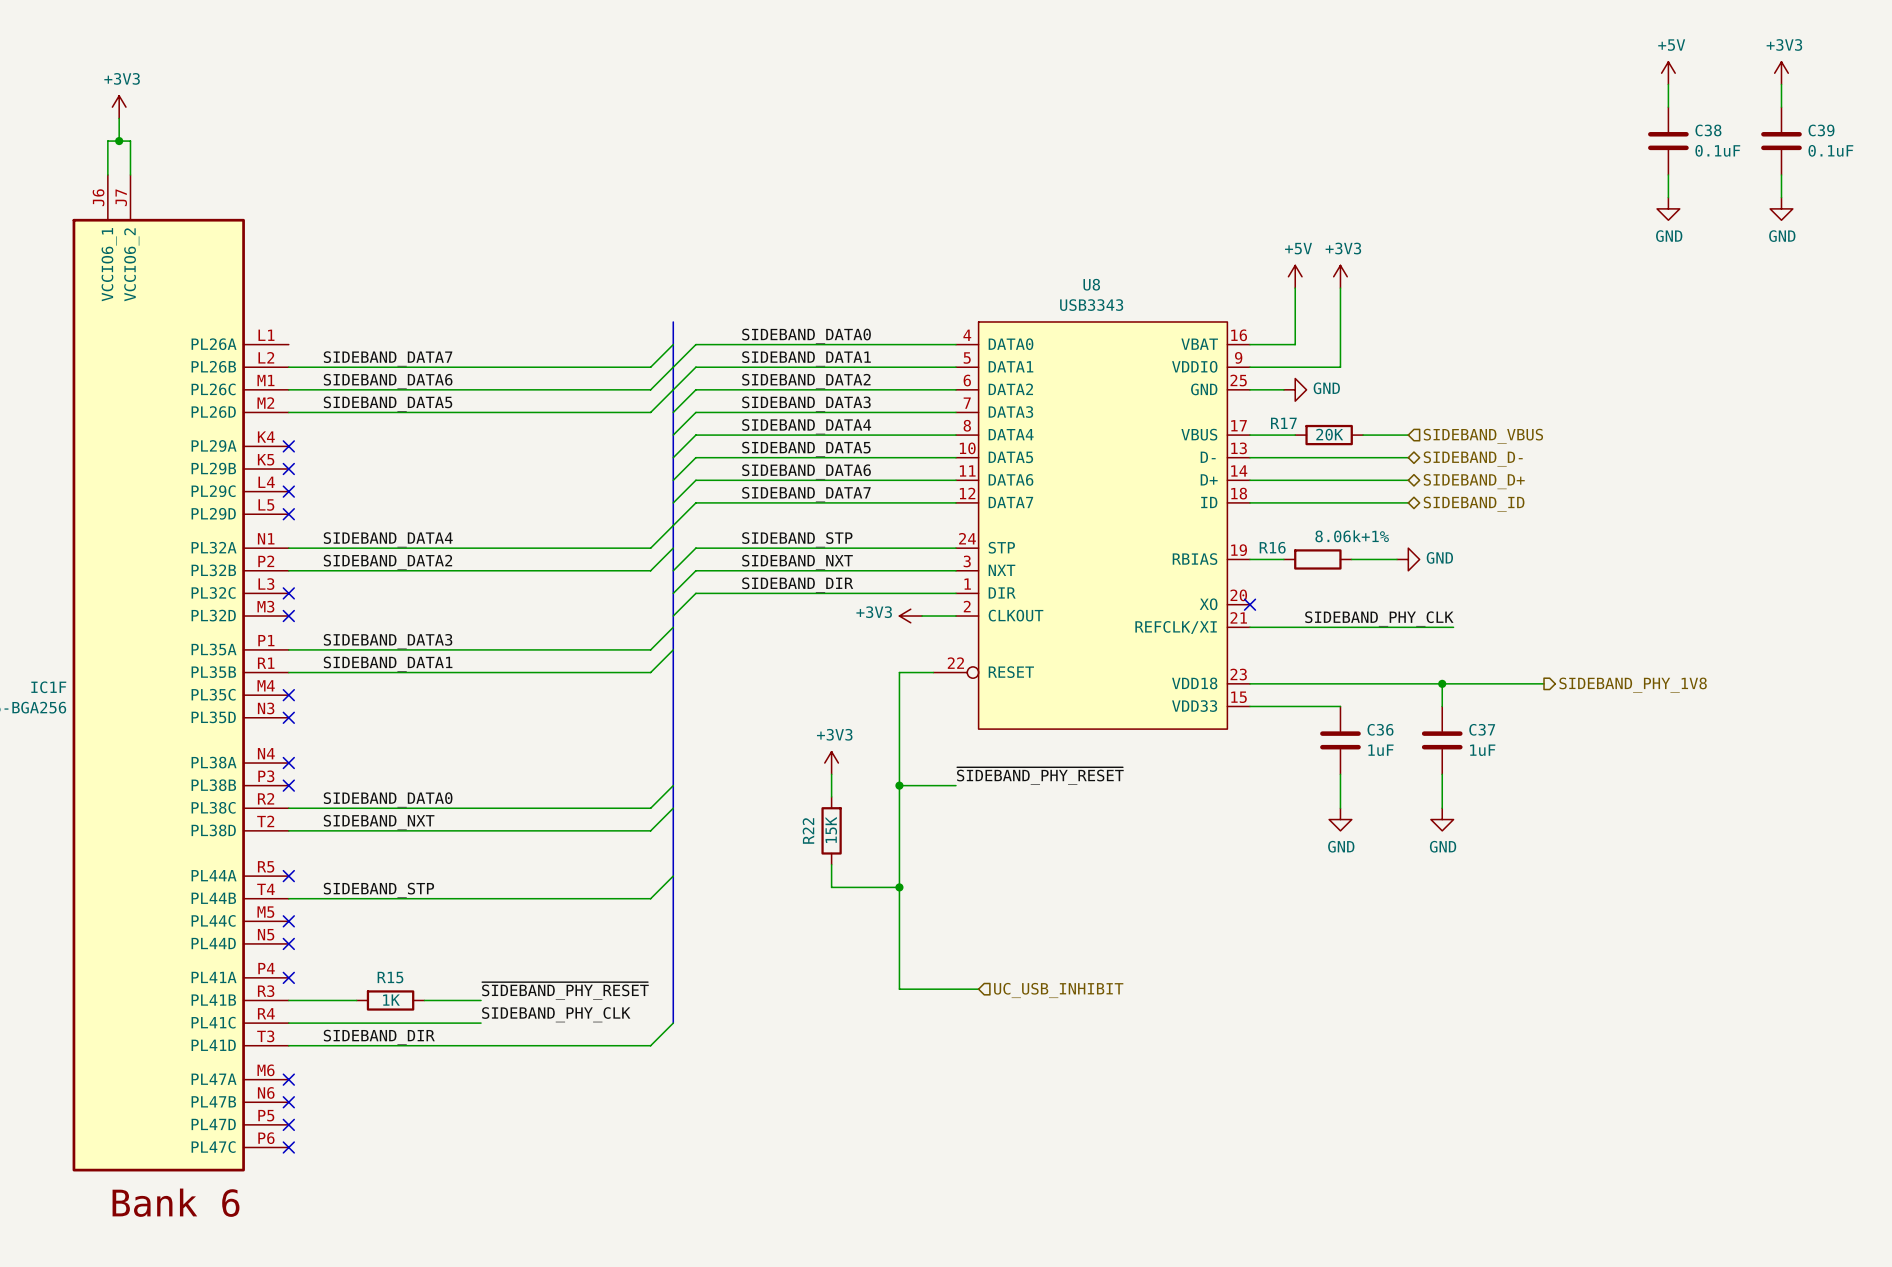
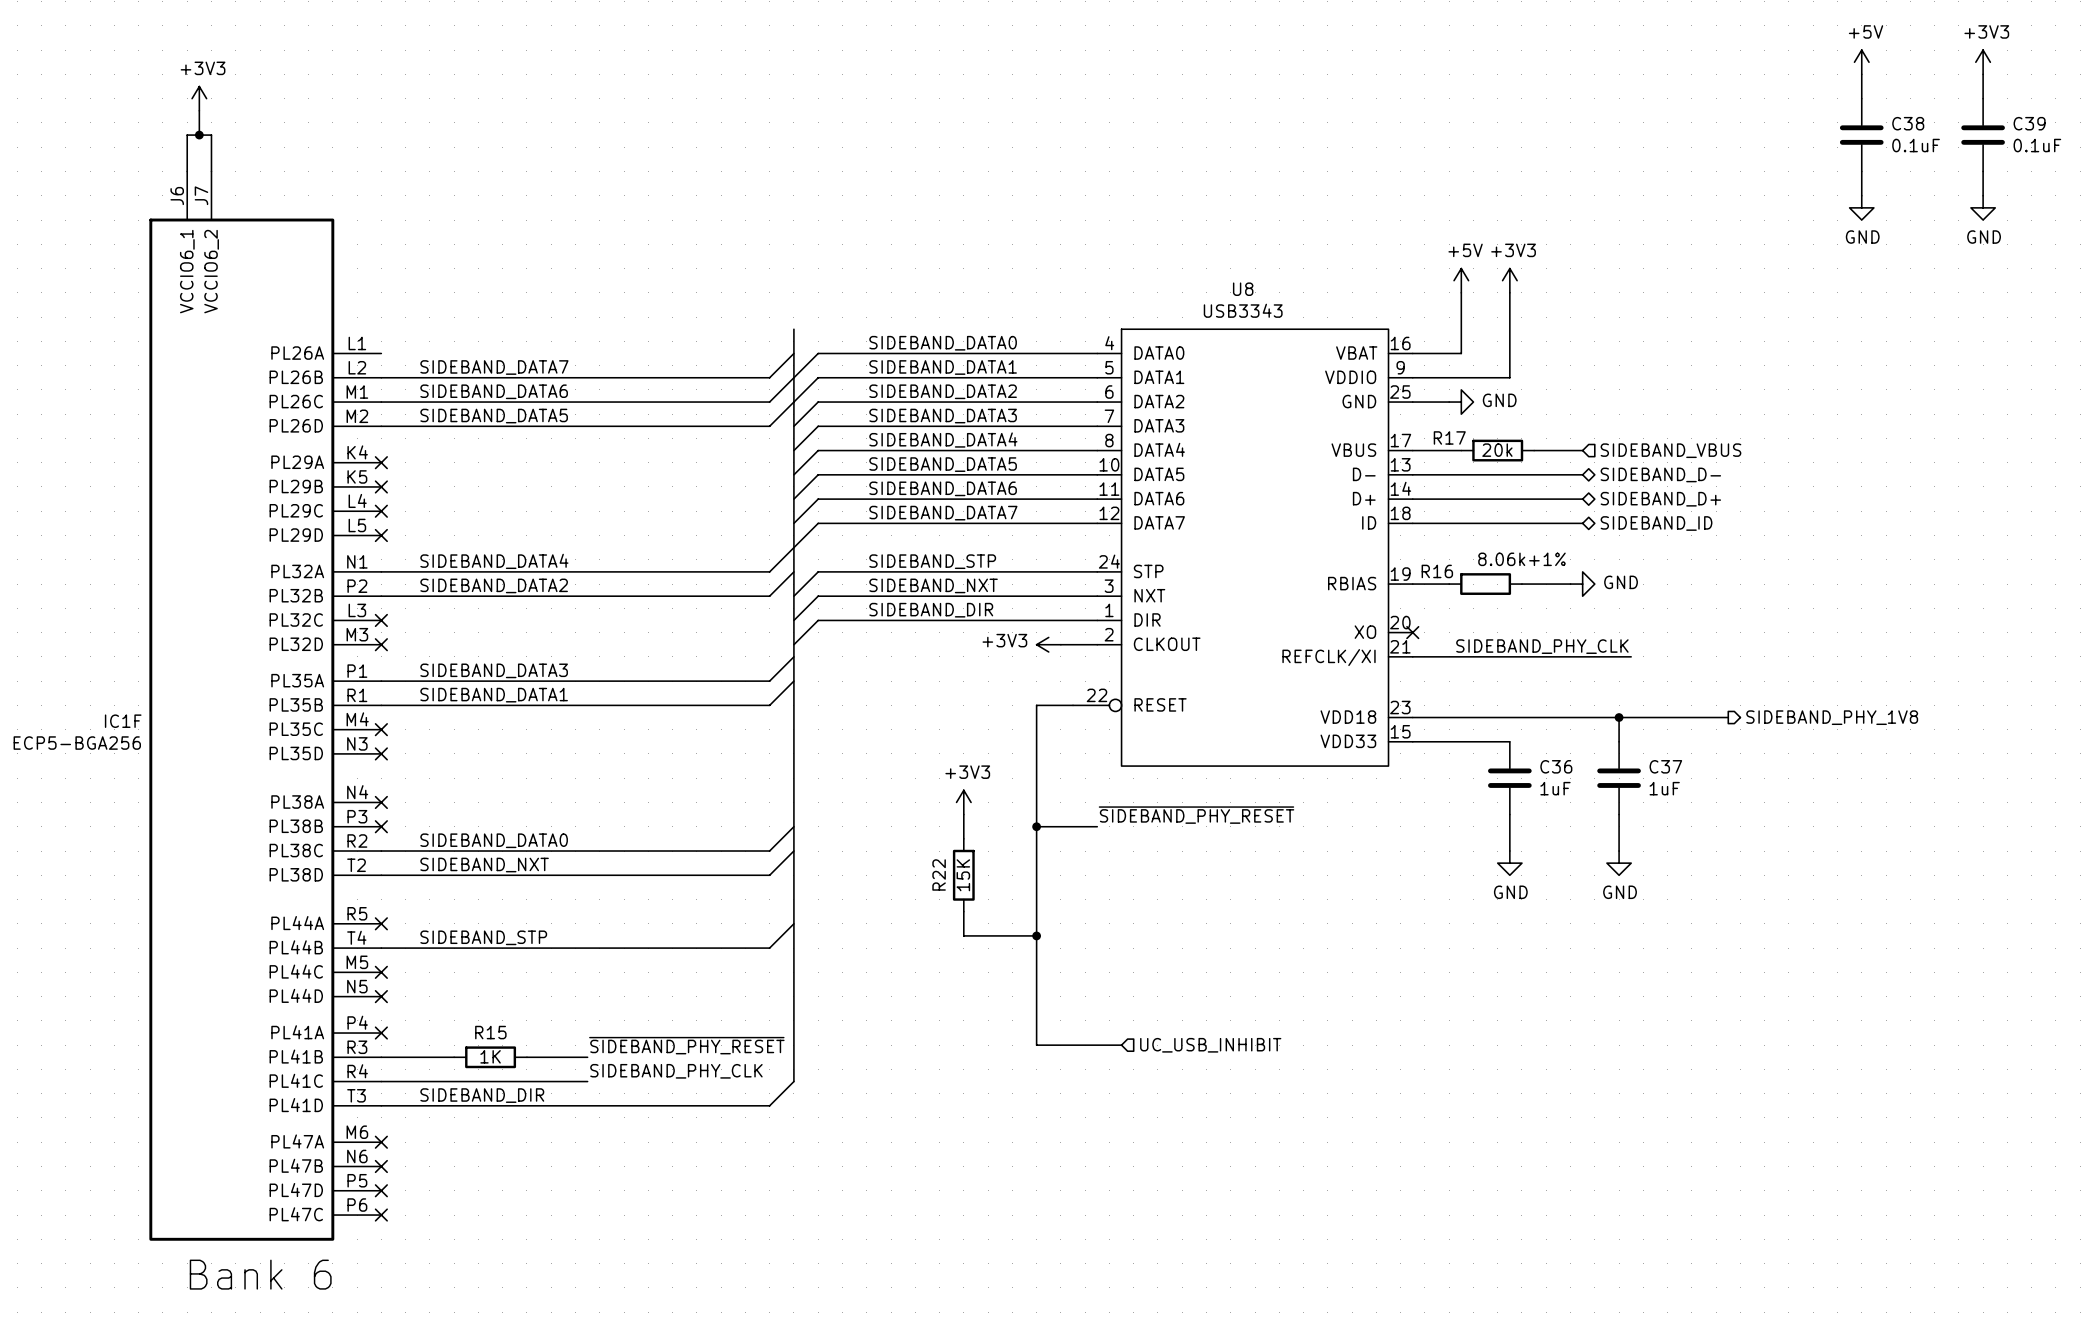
R17 value: 20K (1329, 434) -> 20k (1497, 450)

